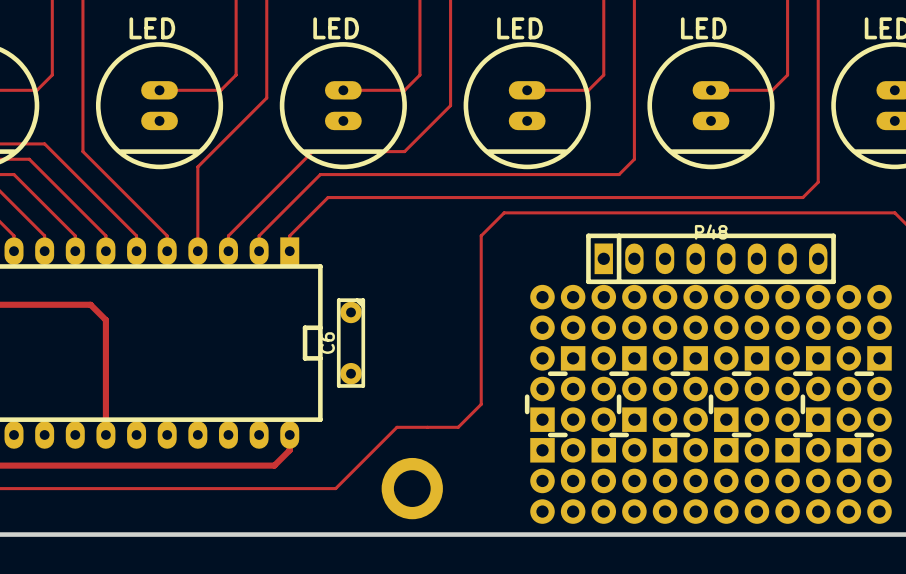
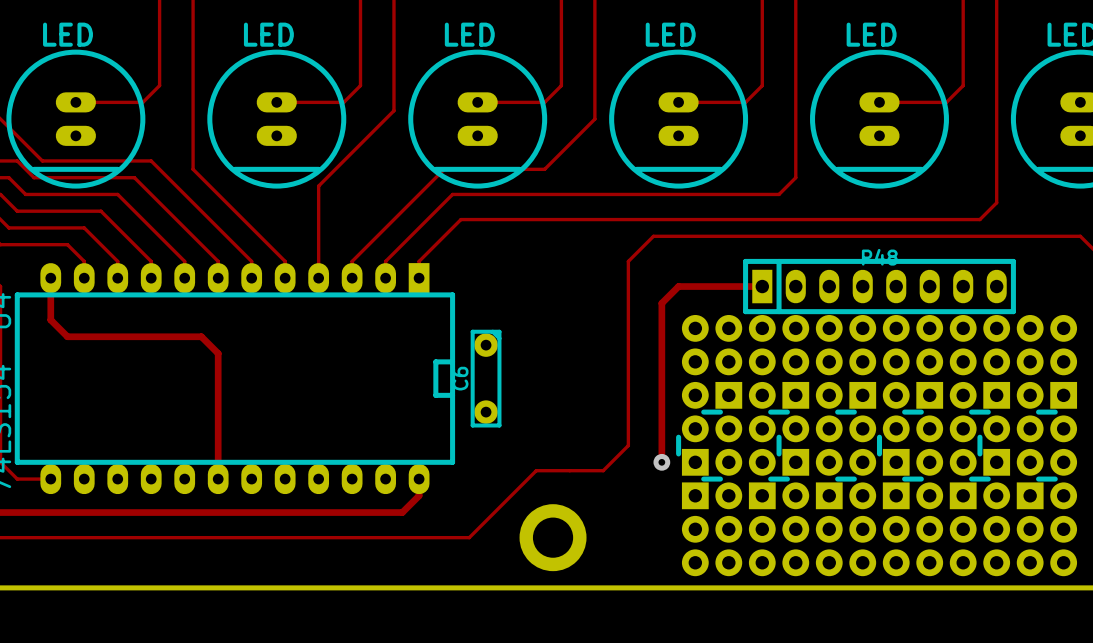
track: none -> (762, 286) (678, 286) (661, 303) (661, 462)
via: none -> (661, 462)

